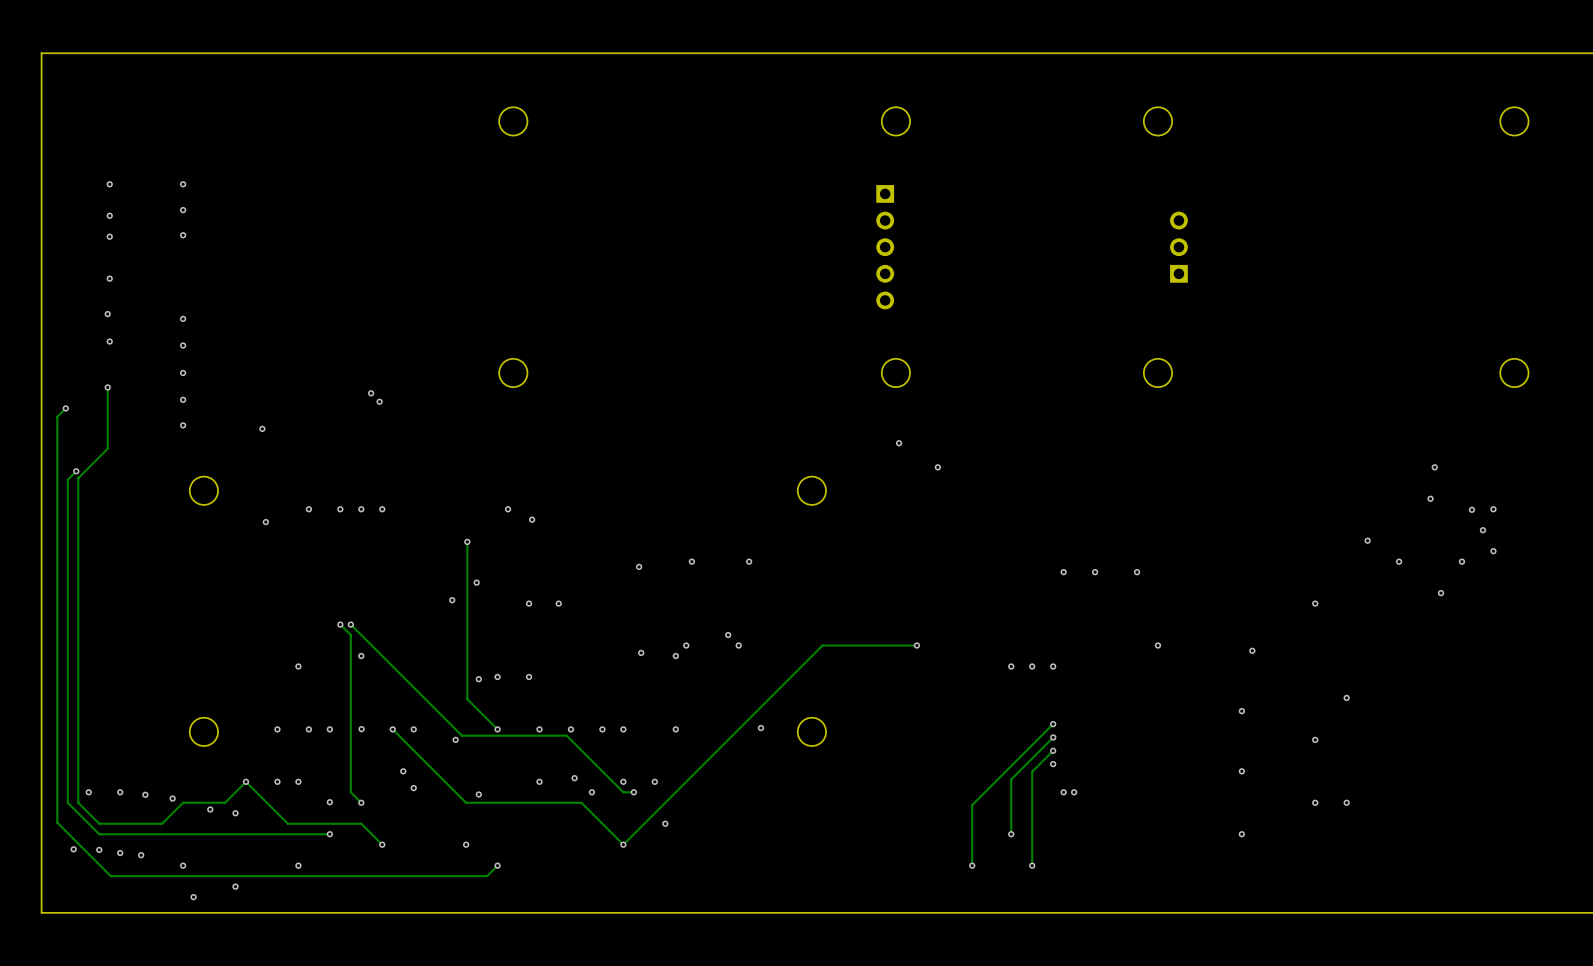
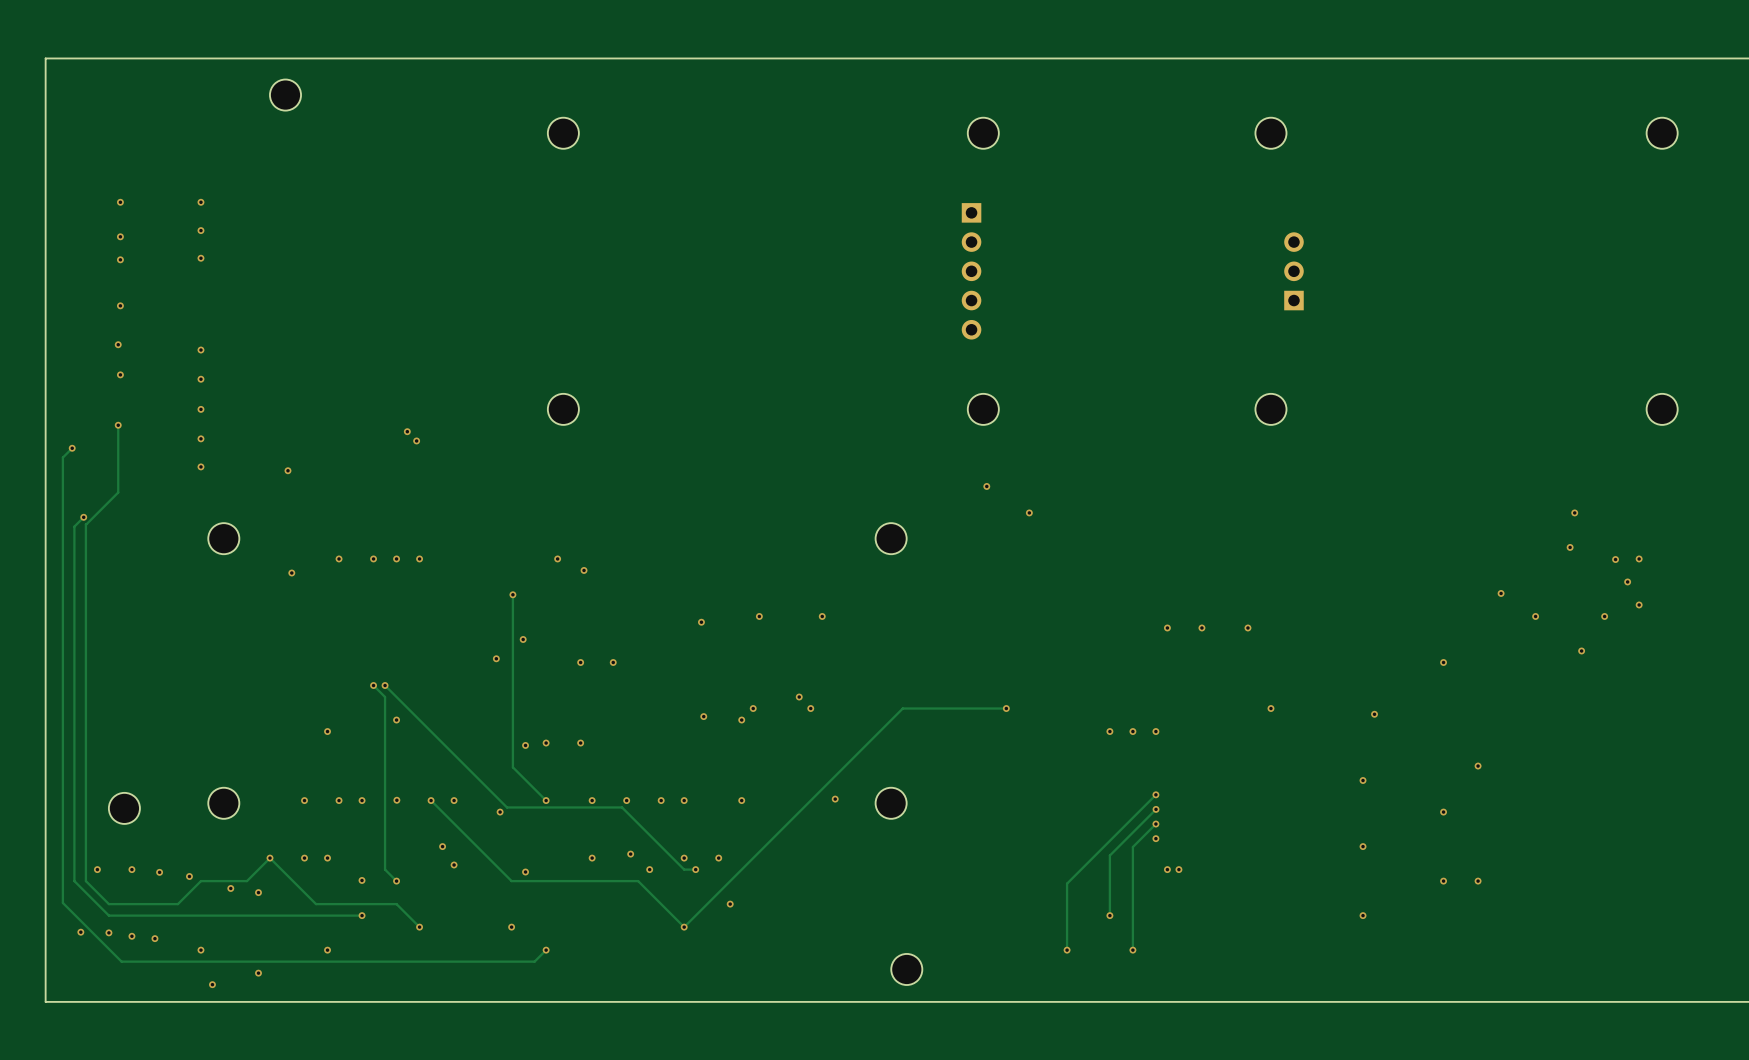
part: none -> (285, 95)
part: none -> (124, 808)
part: none -> (906, 969)

